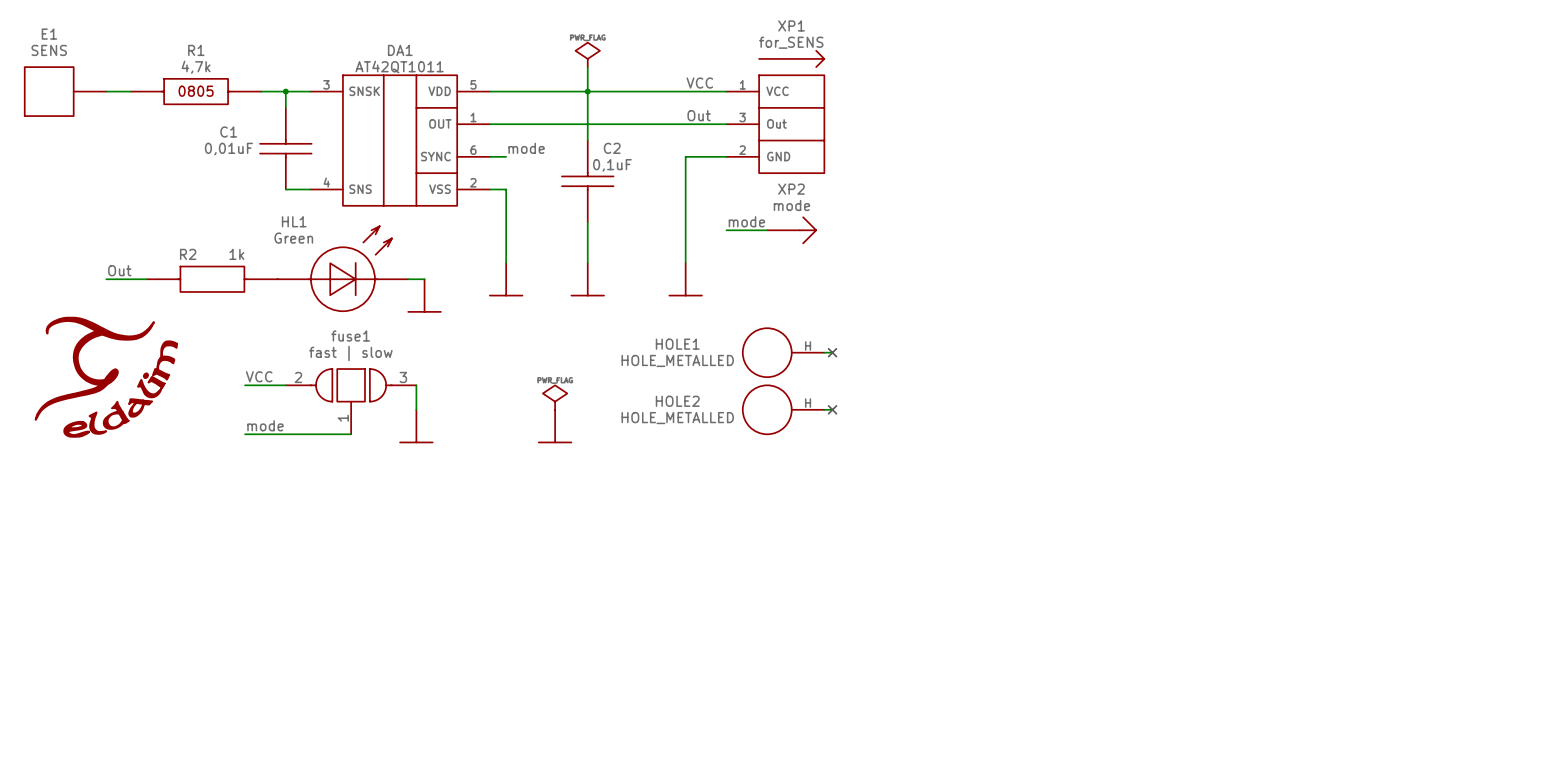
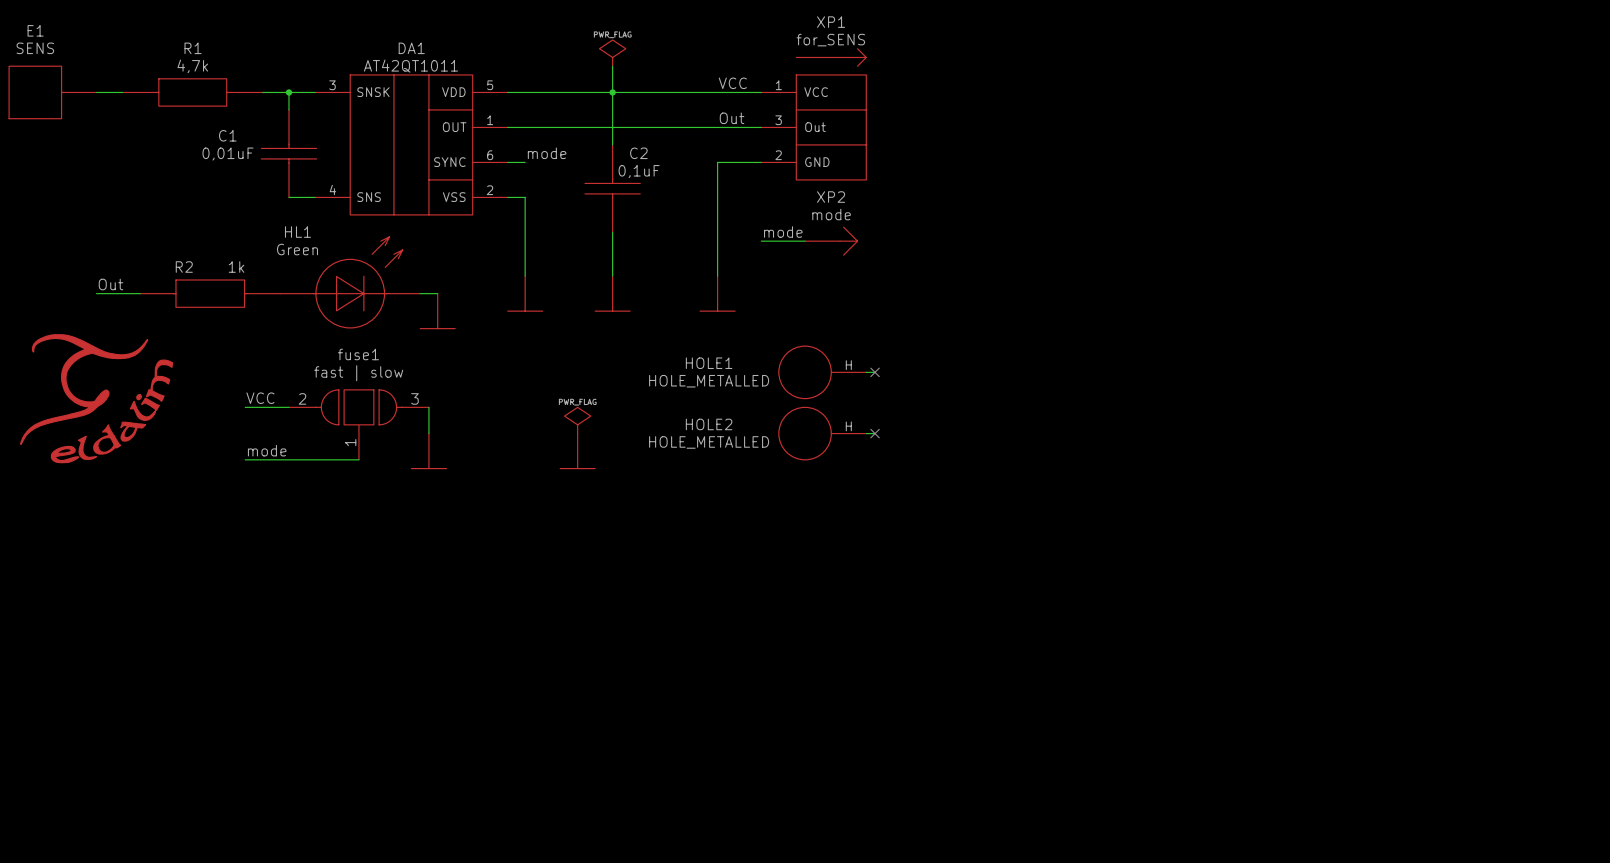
R1 symbol: [130, 78, 262, 105] -> [122, 78, 263, 107]

